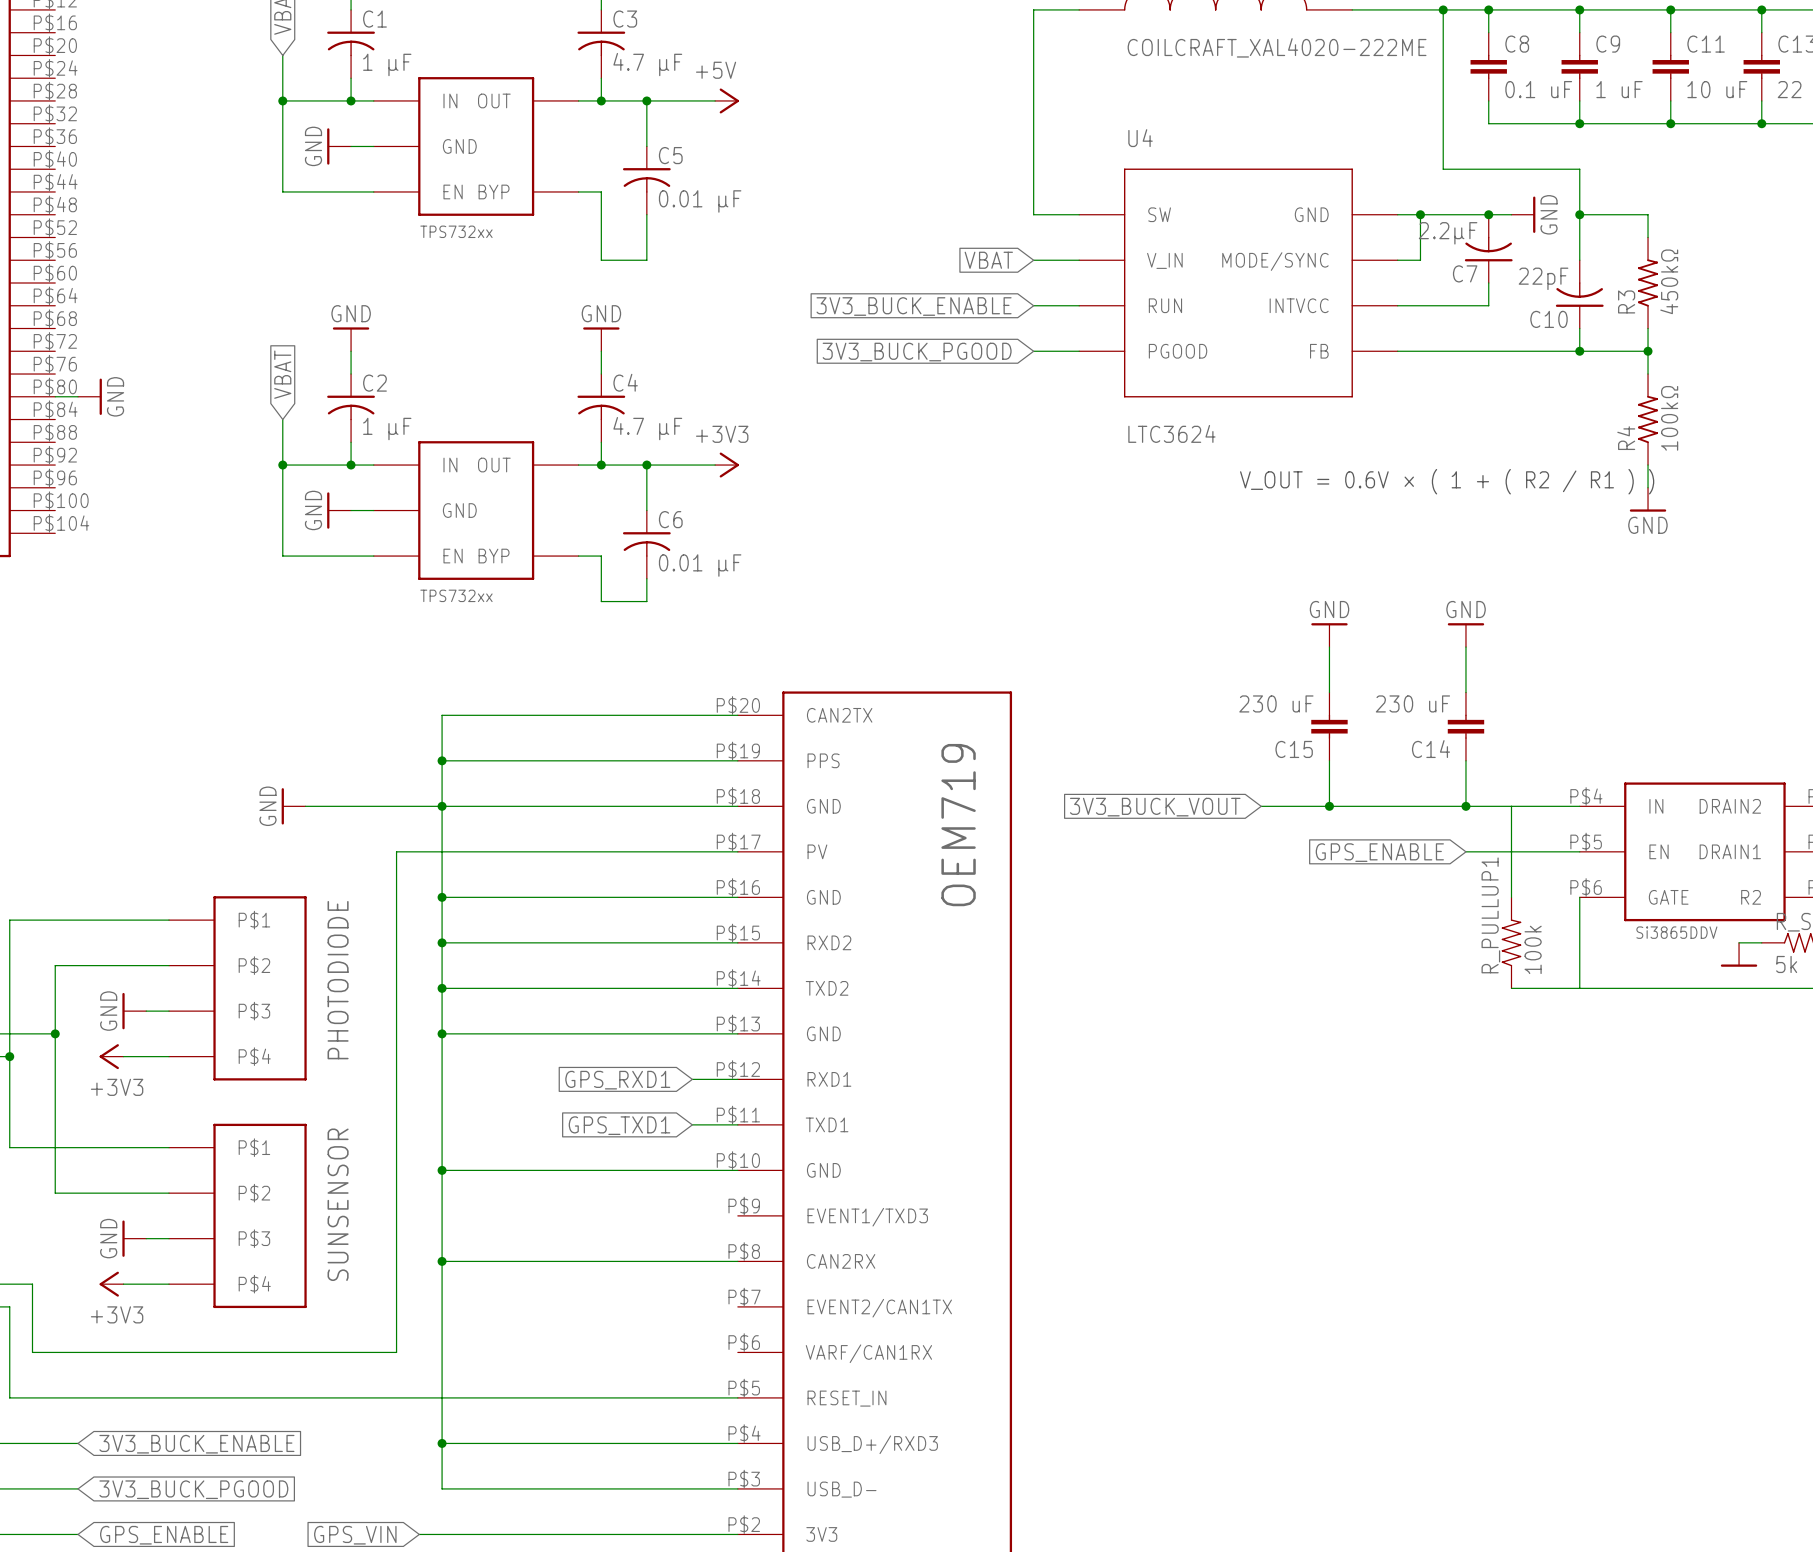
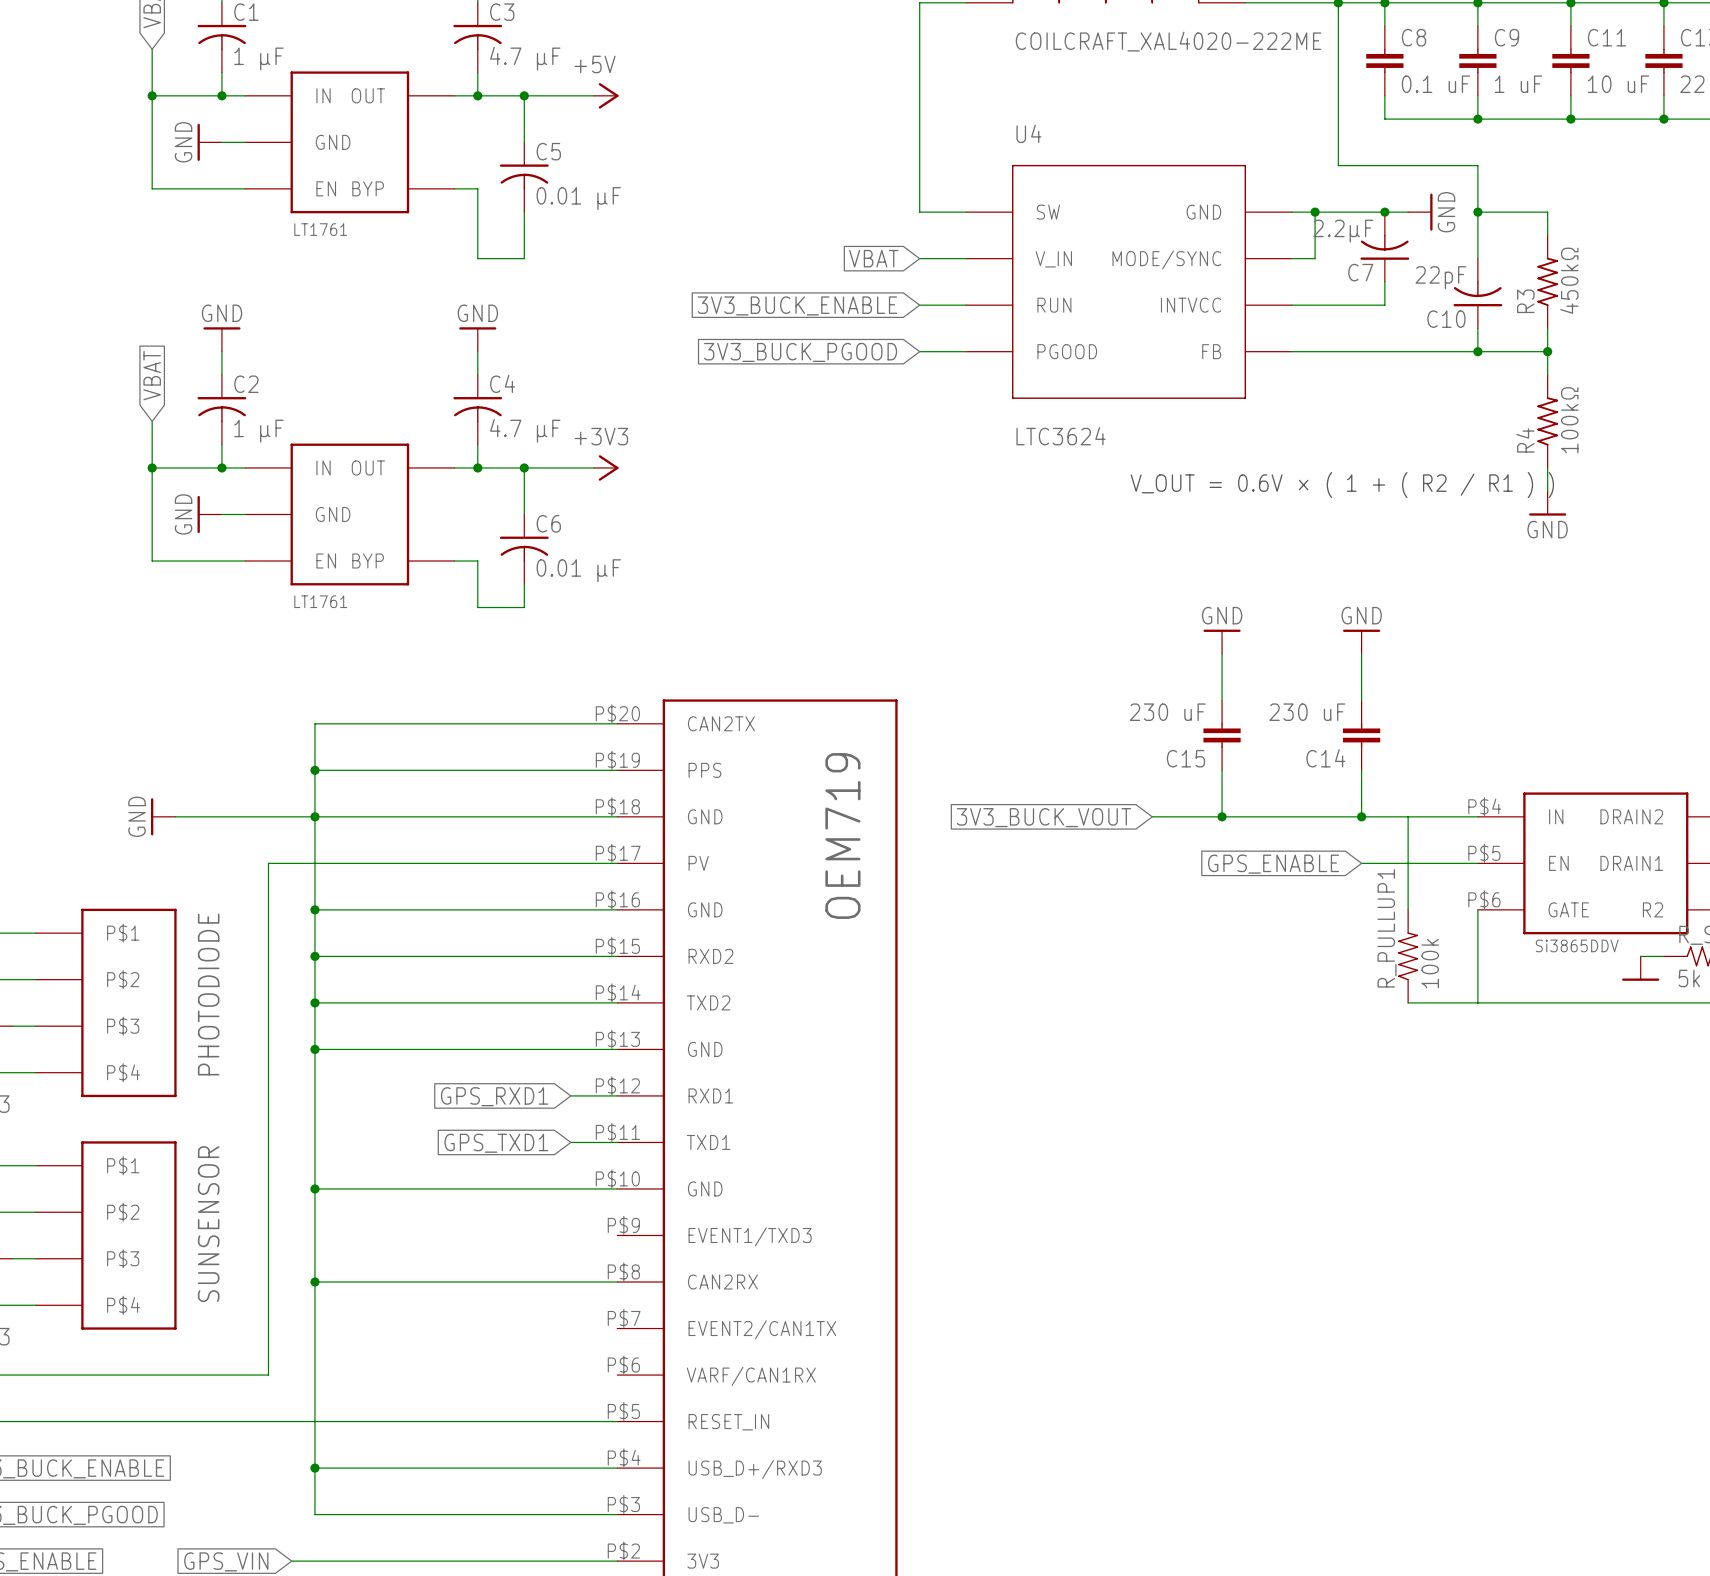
part text: TPS732xx (456, 231) -> LT1761 (320, 229)
part text: TPS732xx (456, 595) -> LT1761 (320, 601)

